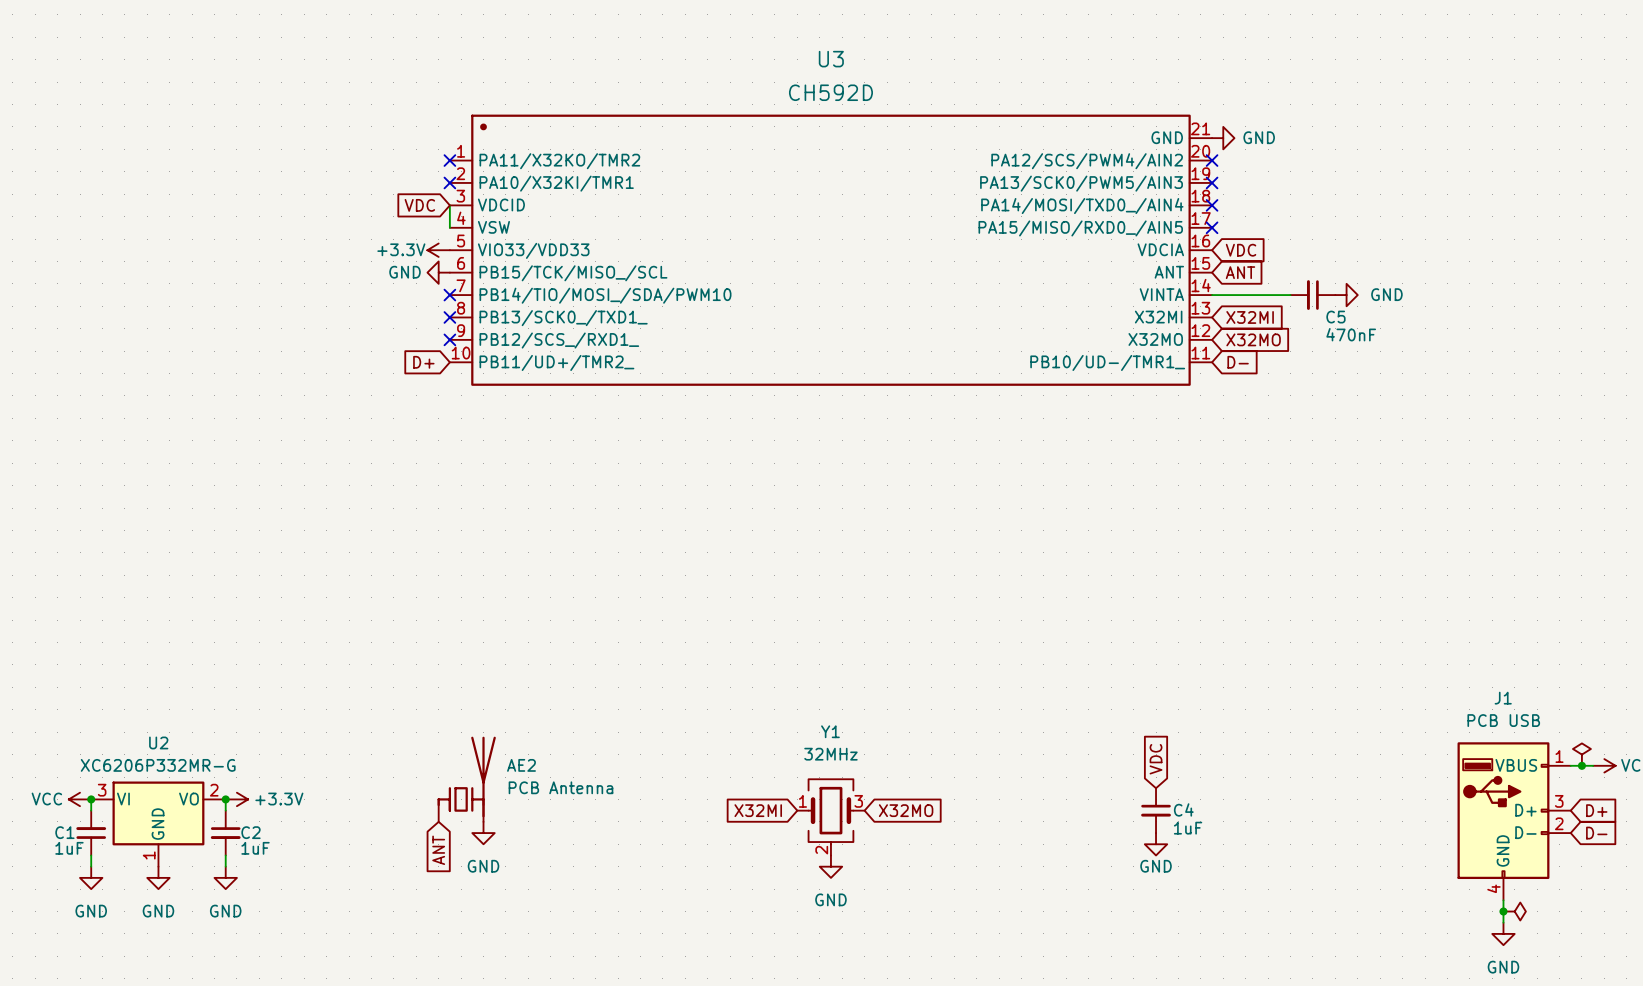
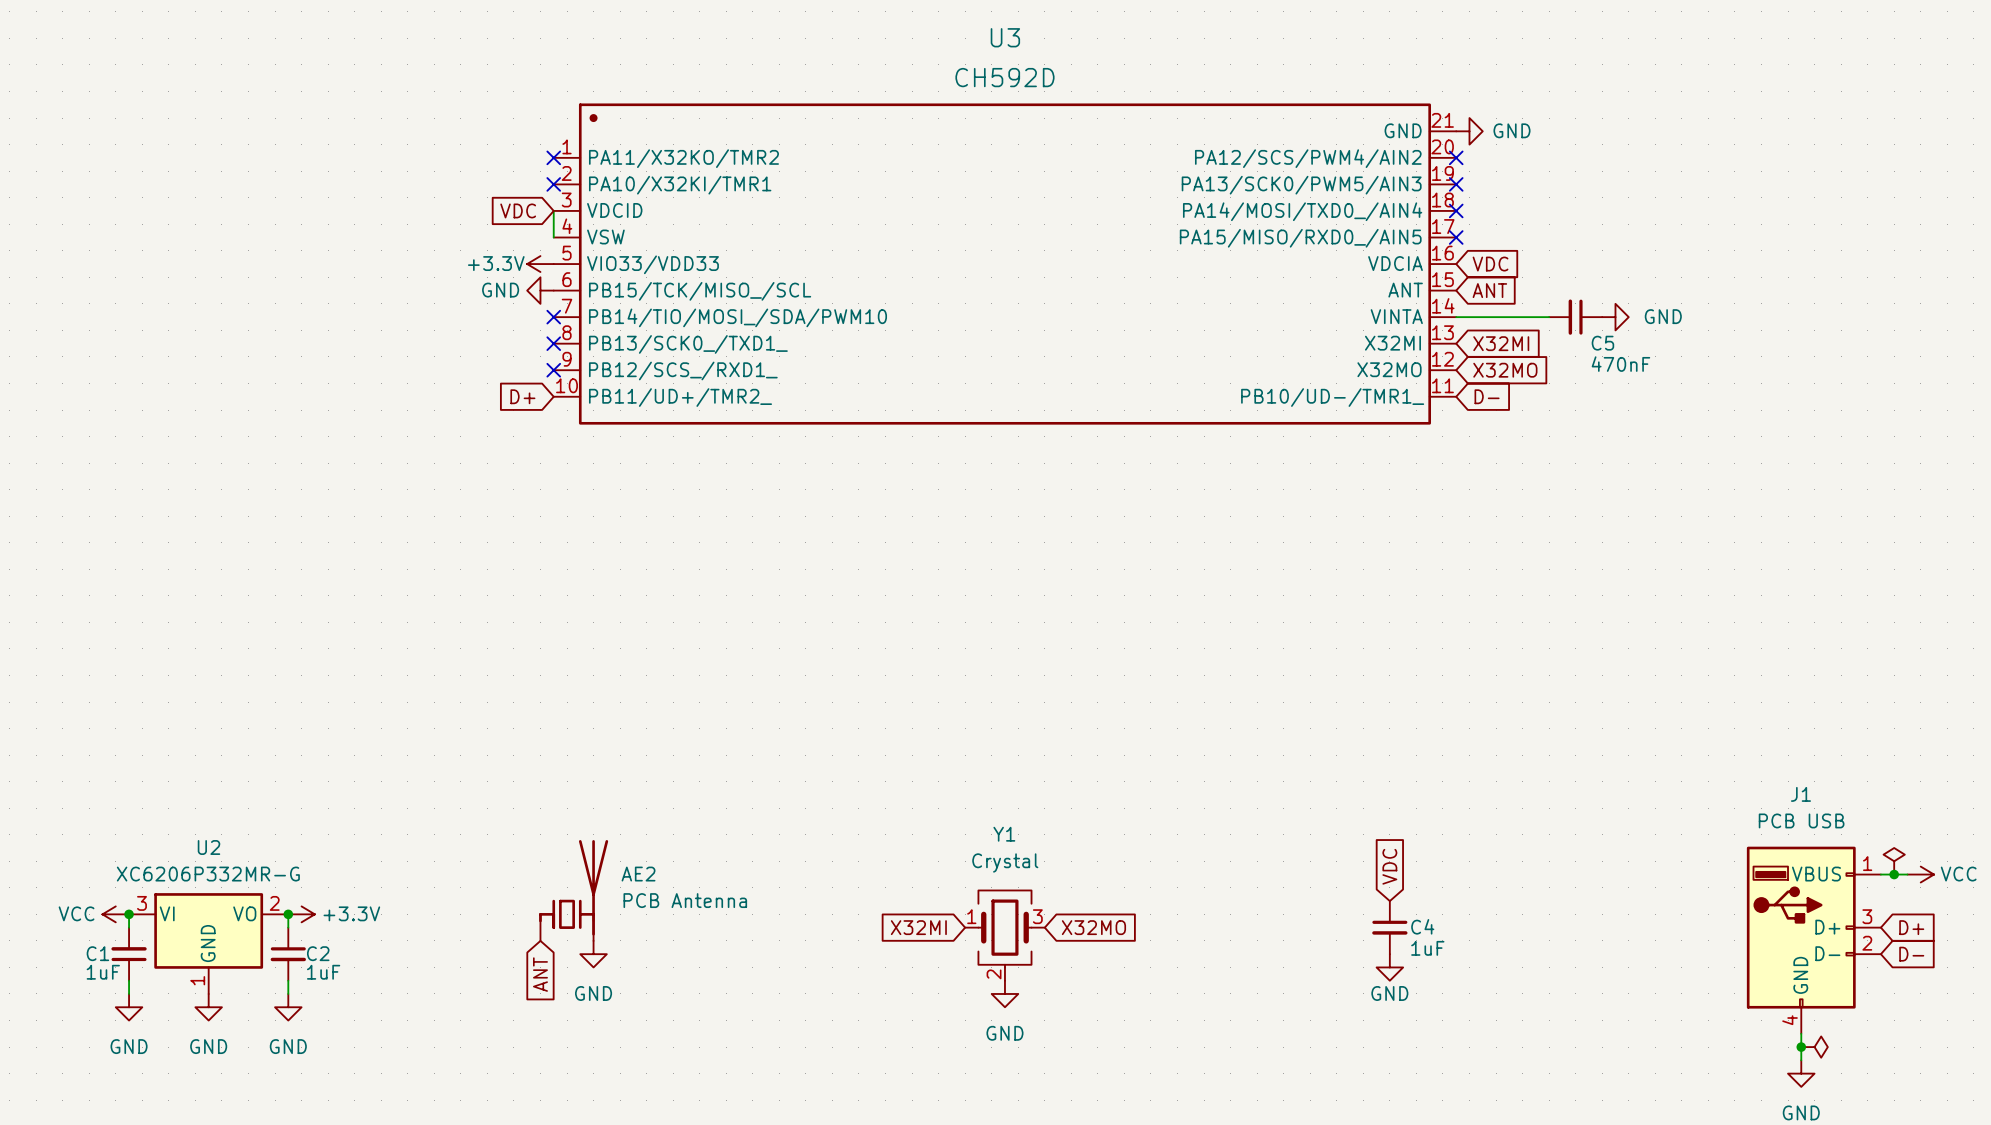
Y1 value: 32MHz (830, 754) -> Crystal (1005, 862)

